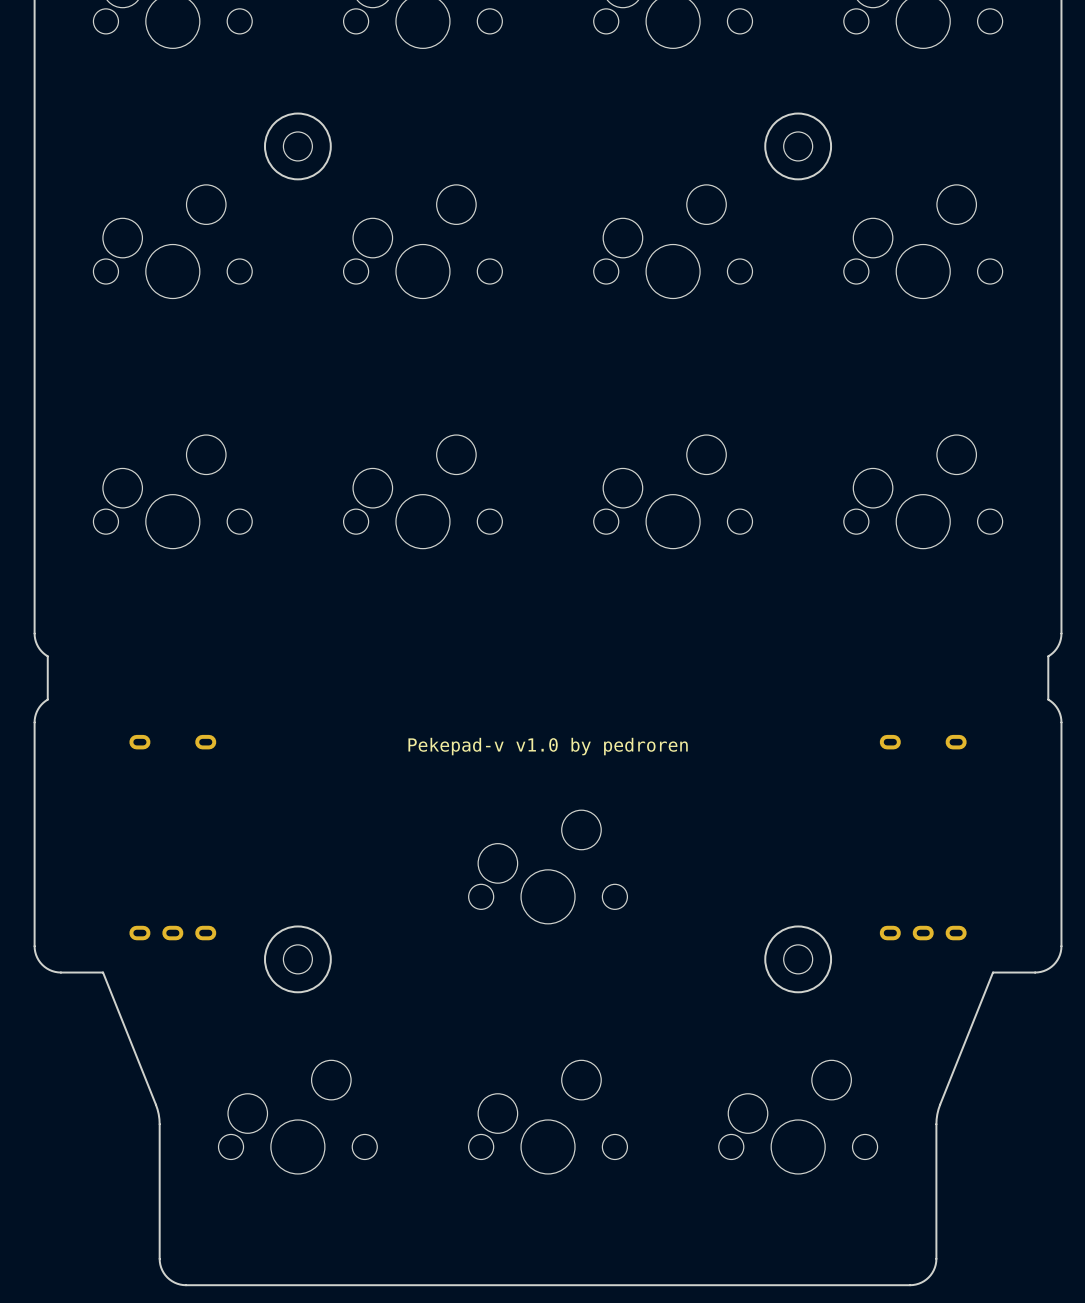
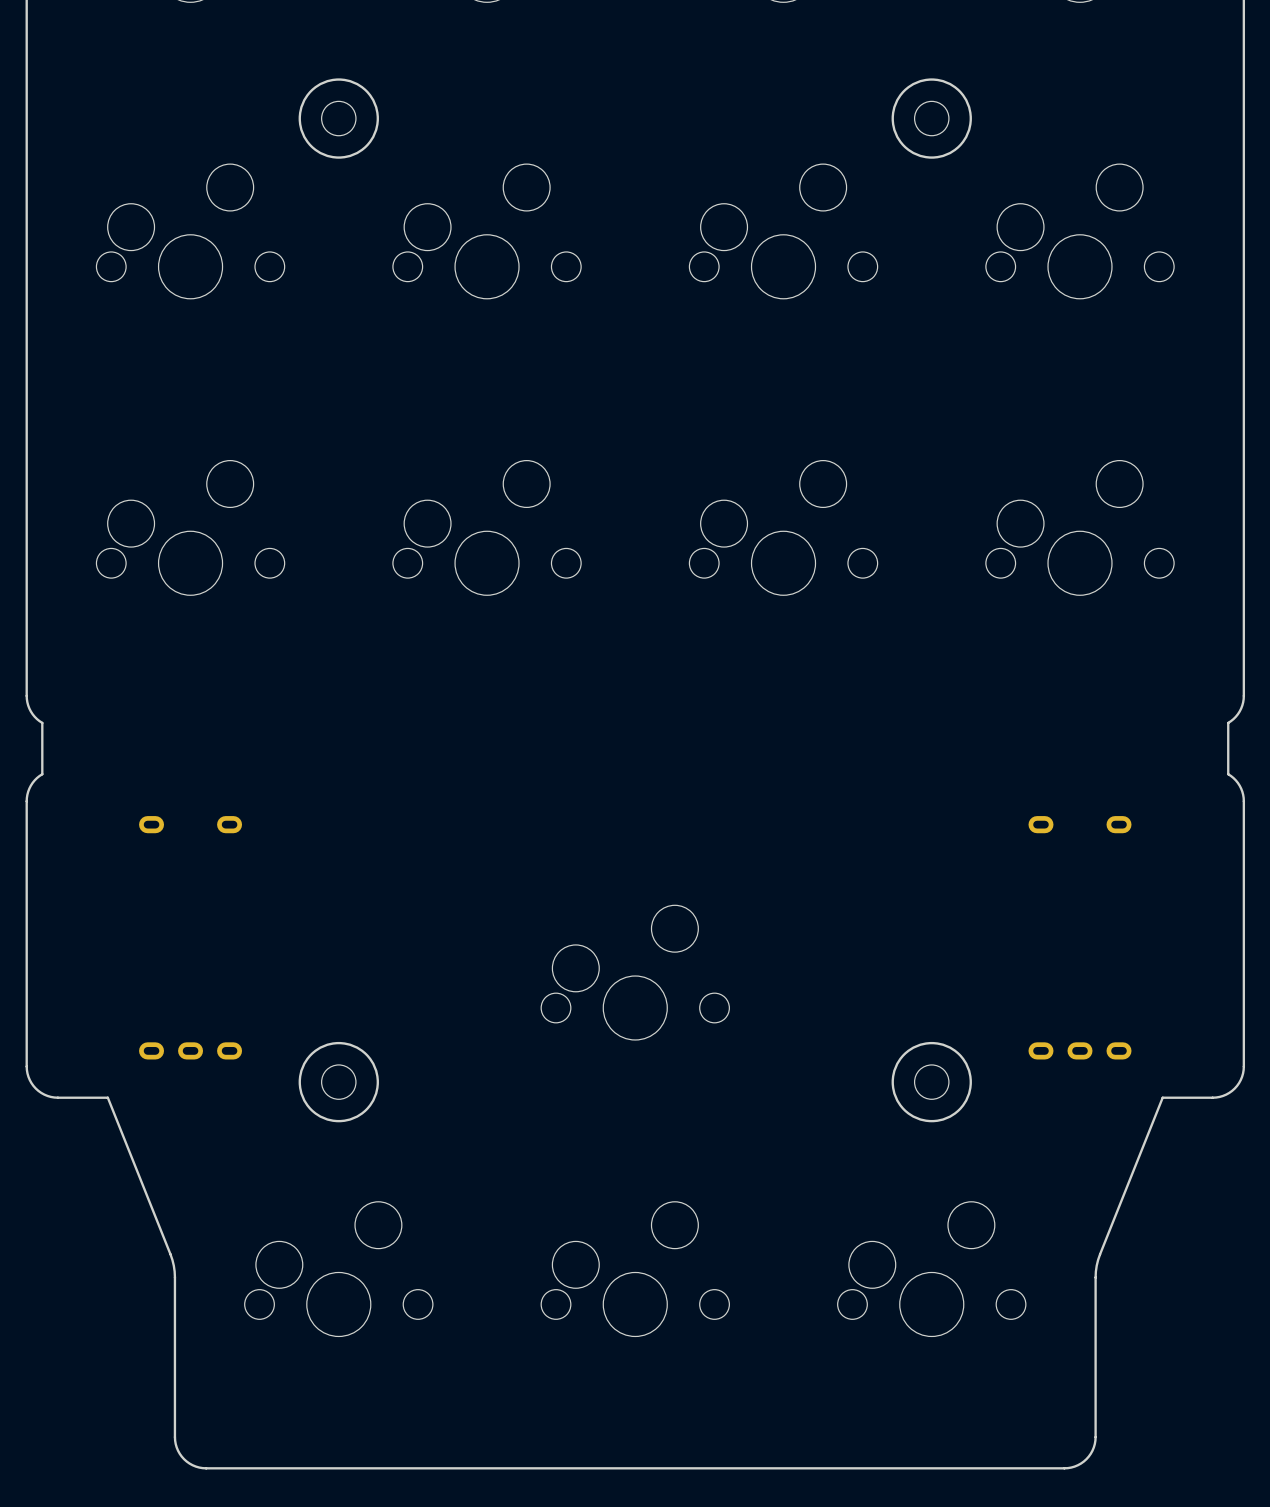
text: Pekepad-v v1.0 by pedroren (548, 746) -> none

